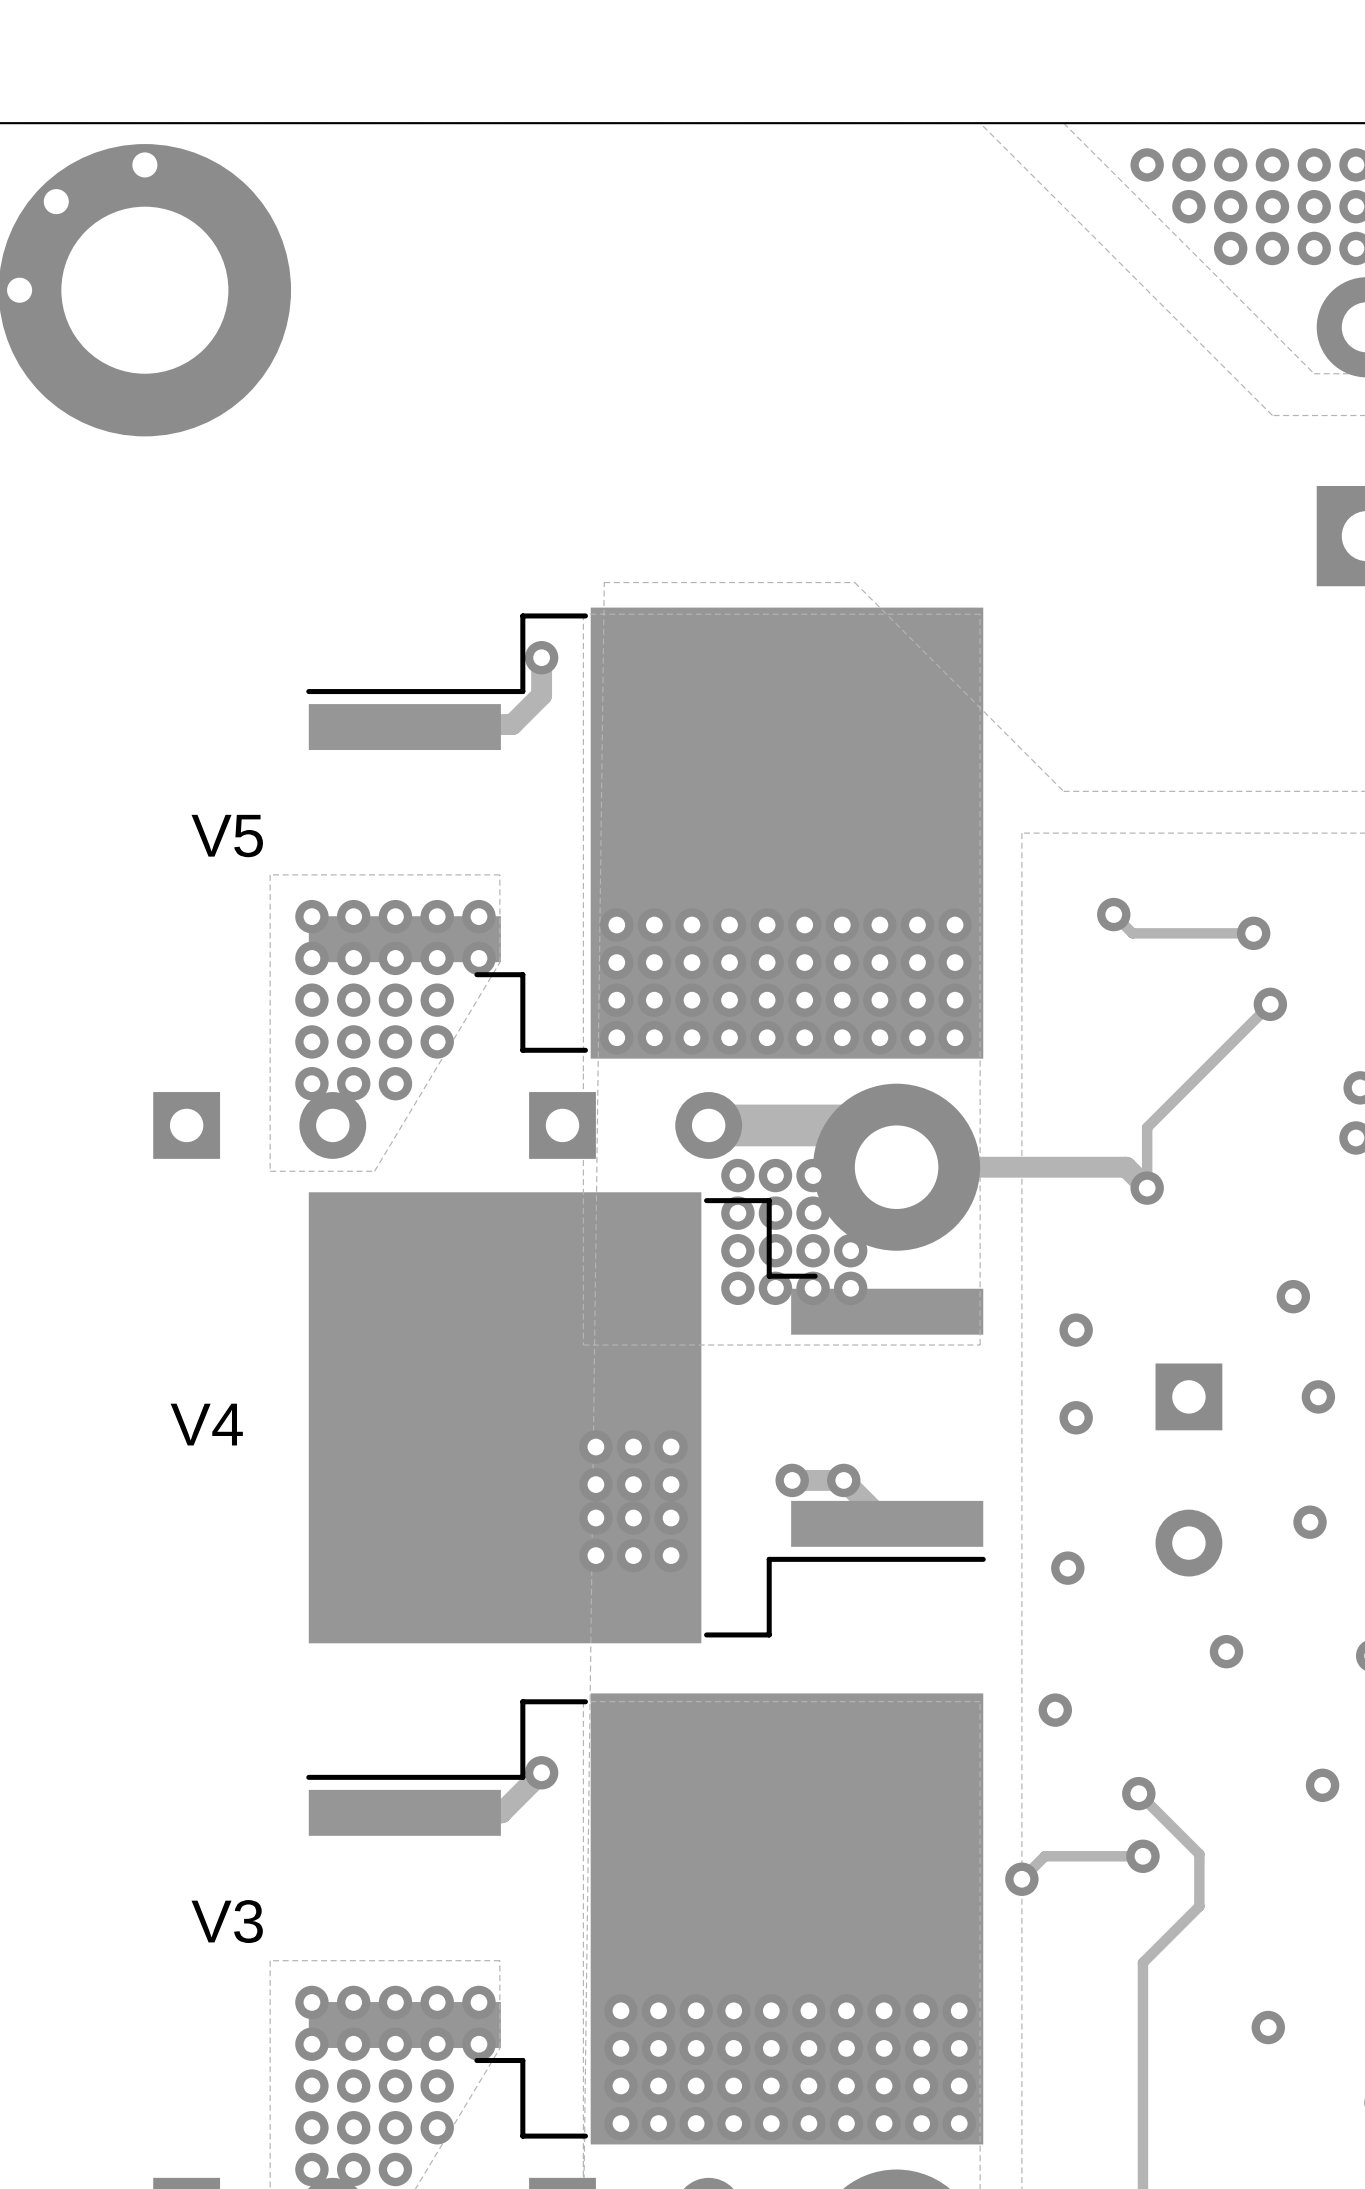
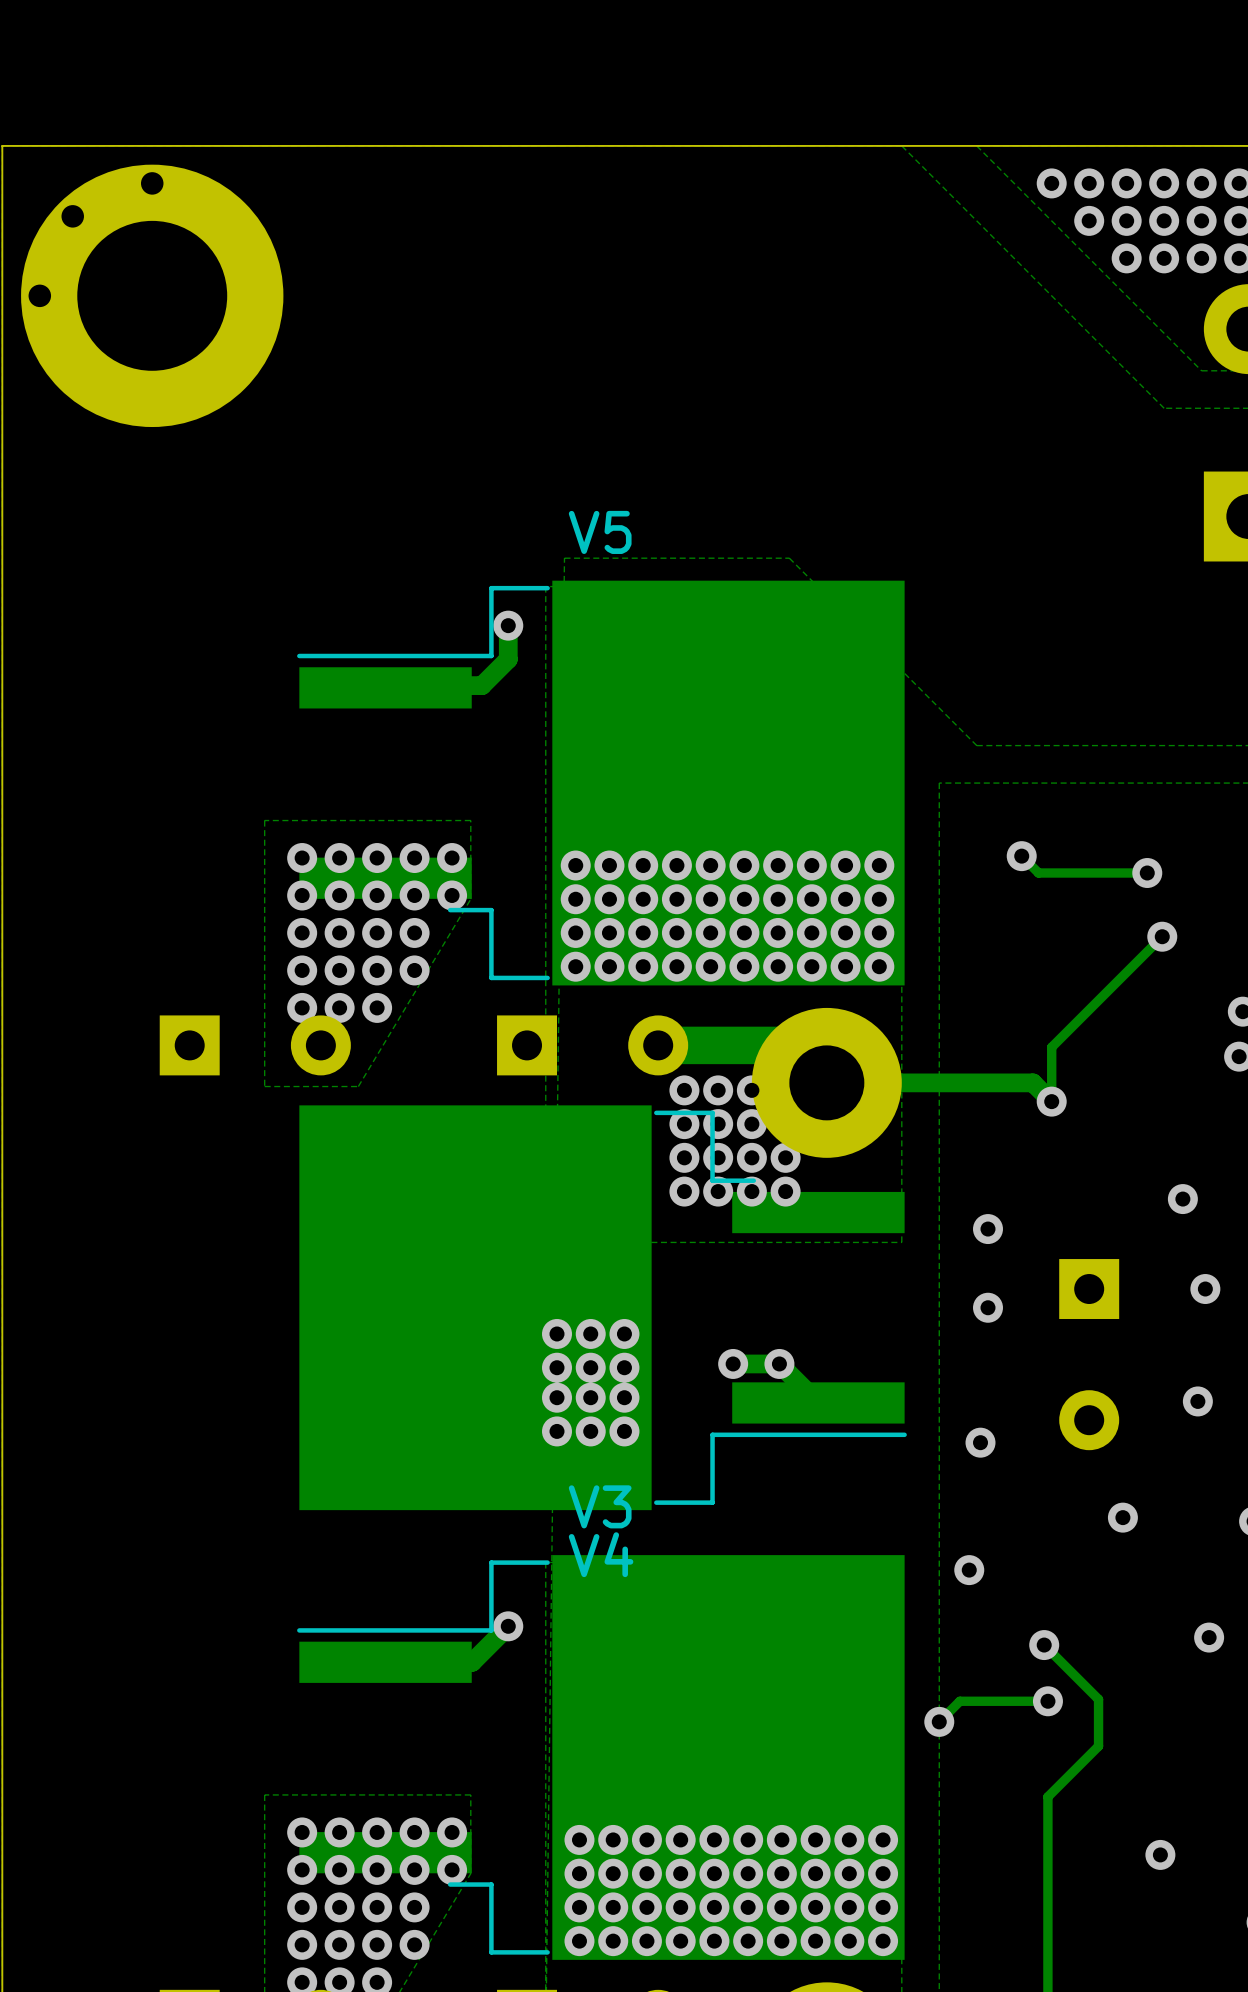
V5 name position: V5 (227, 836) -> V5 (600, 532)
V4 name position: V4 (206, 1424) -> V4 (601, 1554)
V3 name position: V3 (227, 1921) -> V3 (600, 1506)

